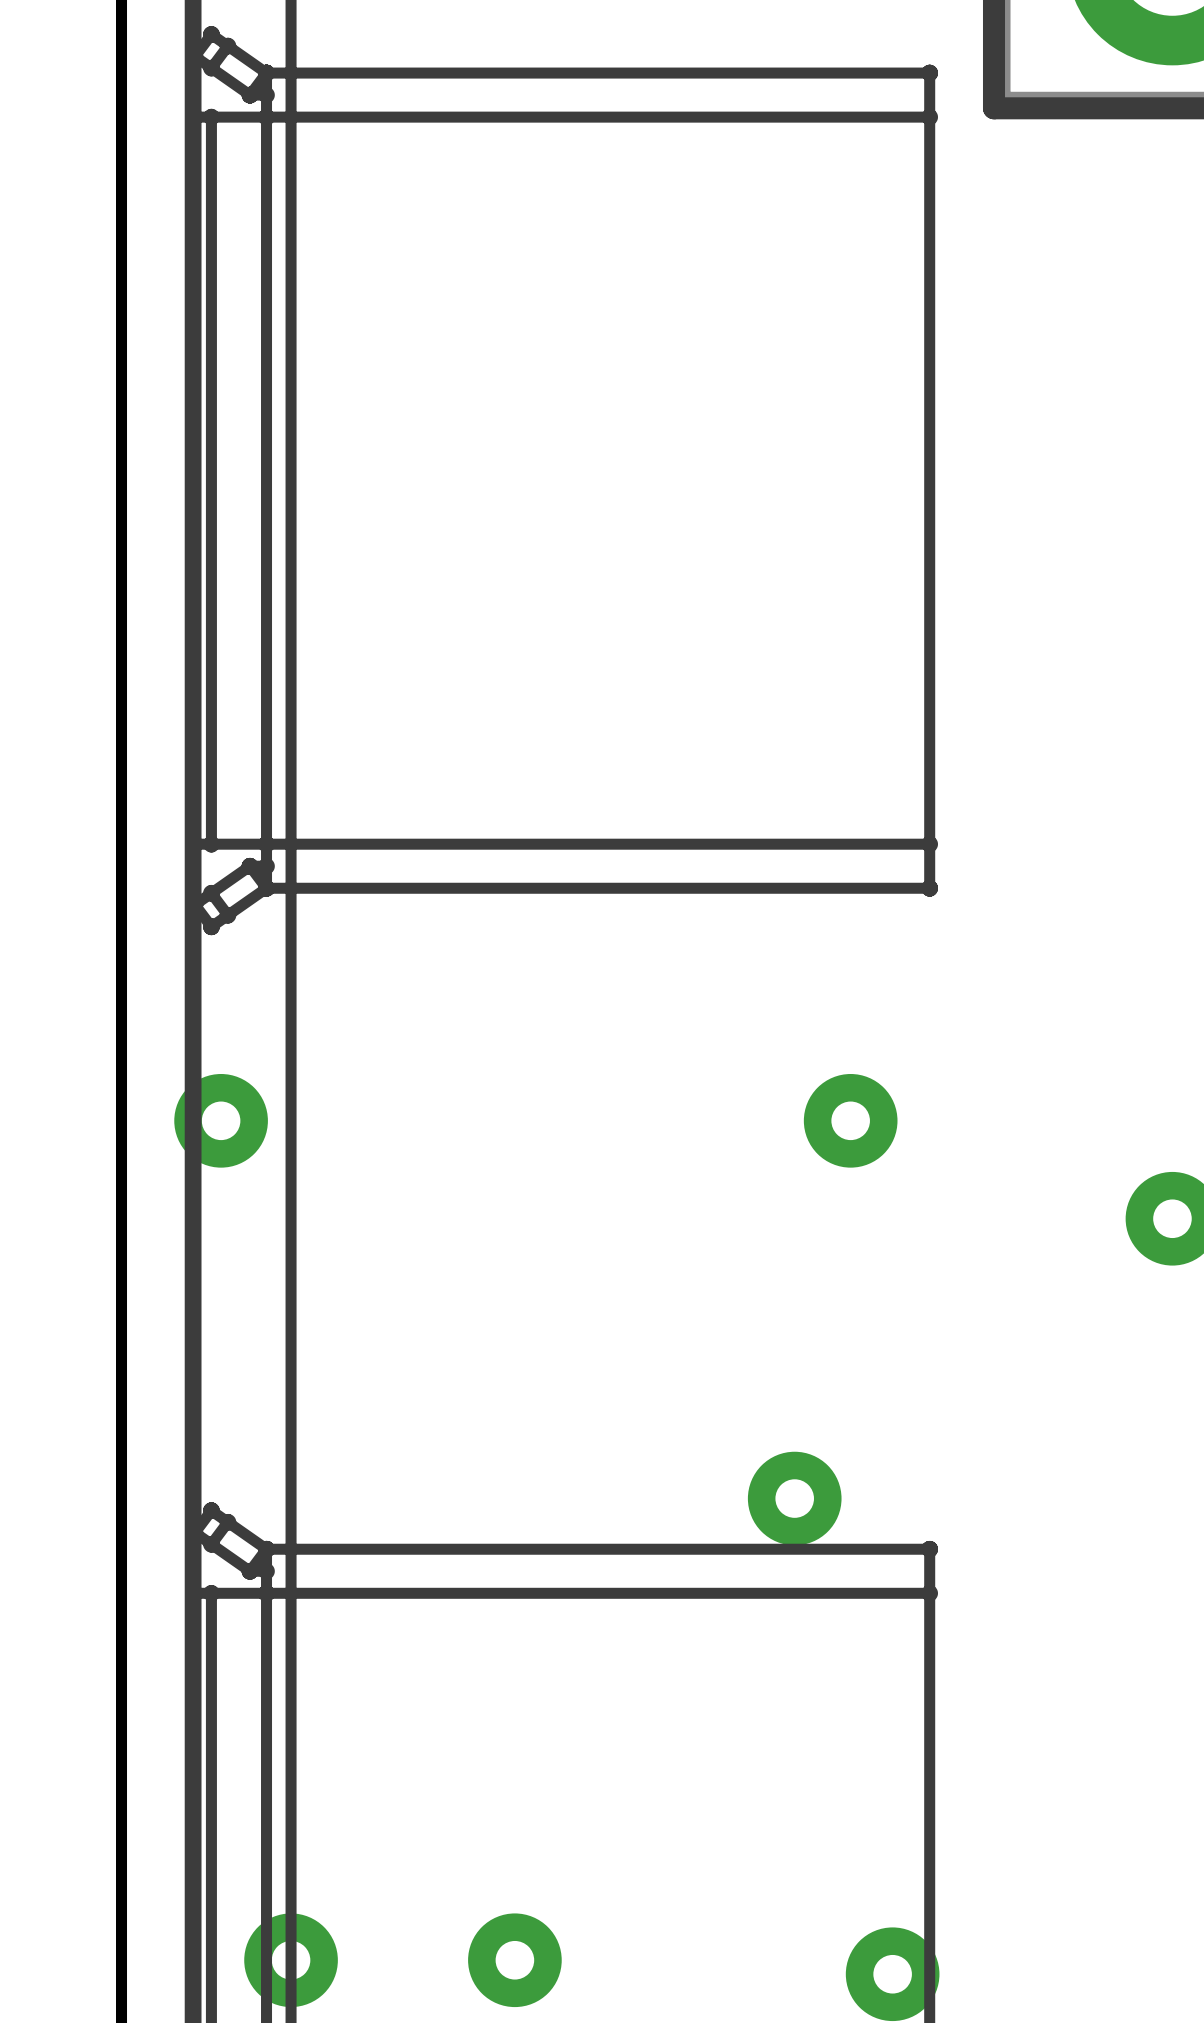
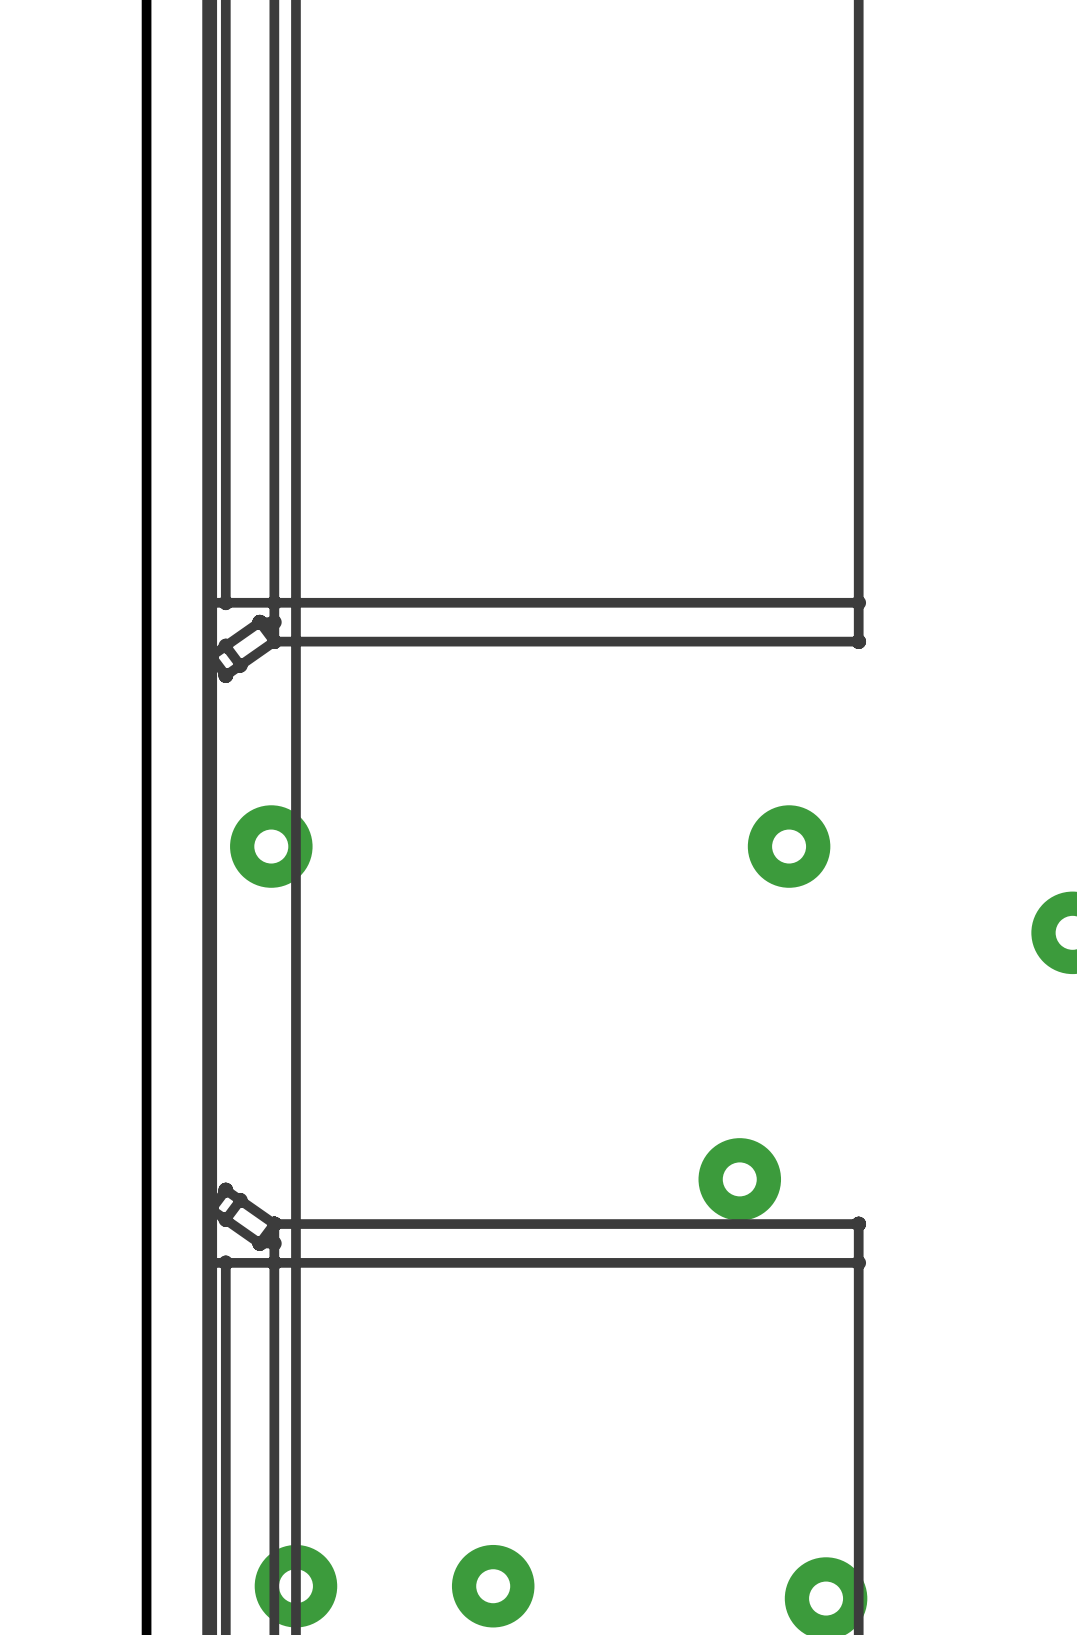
via position: (221, 1120) -> (271, 846)

